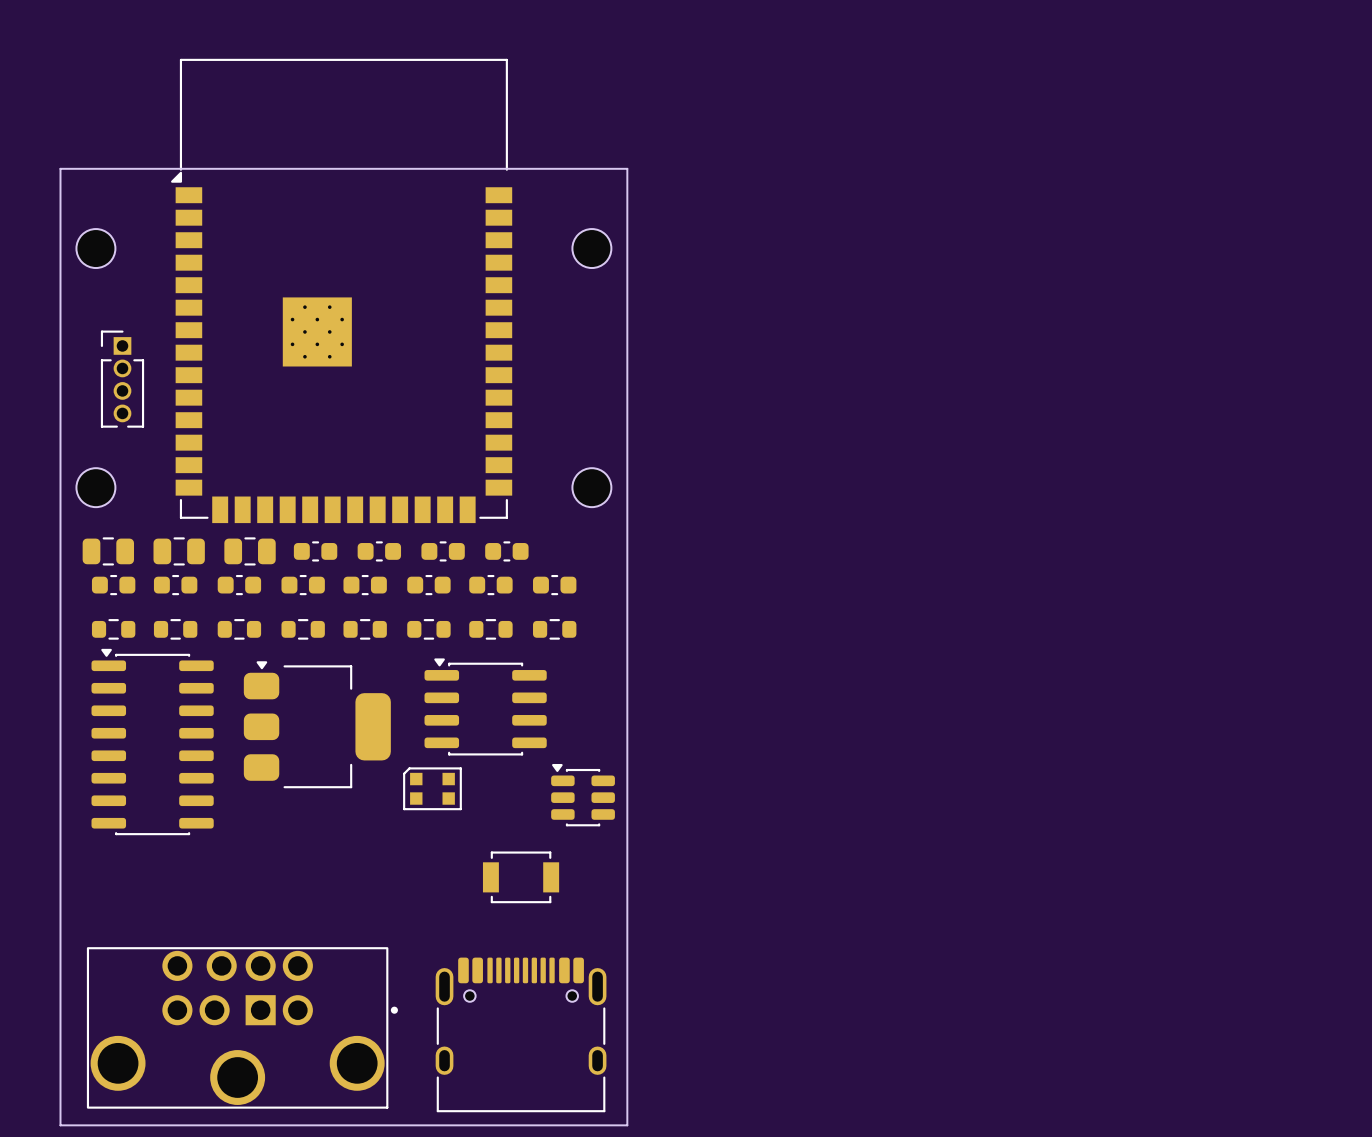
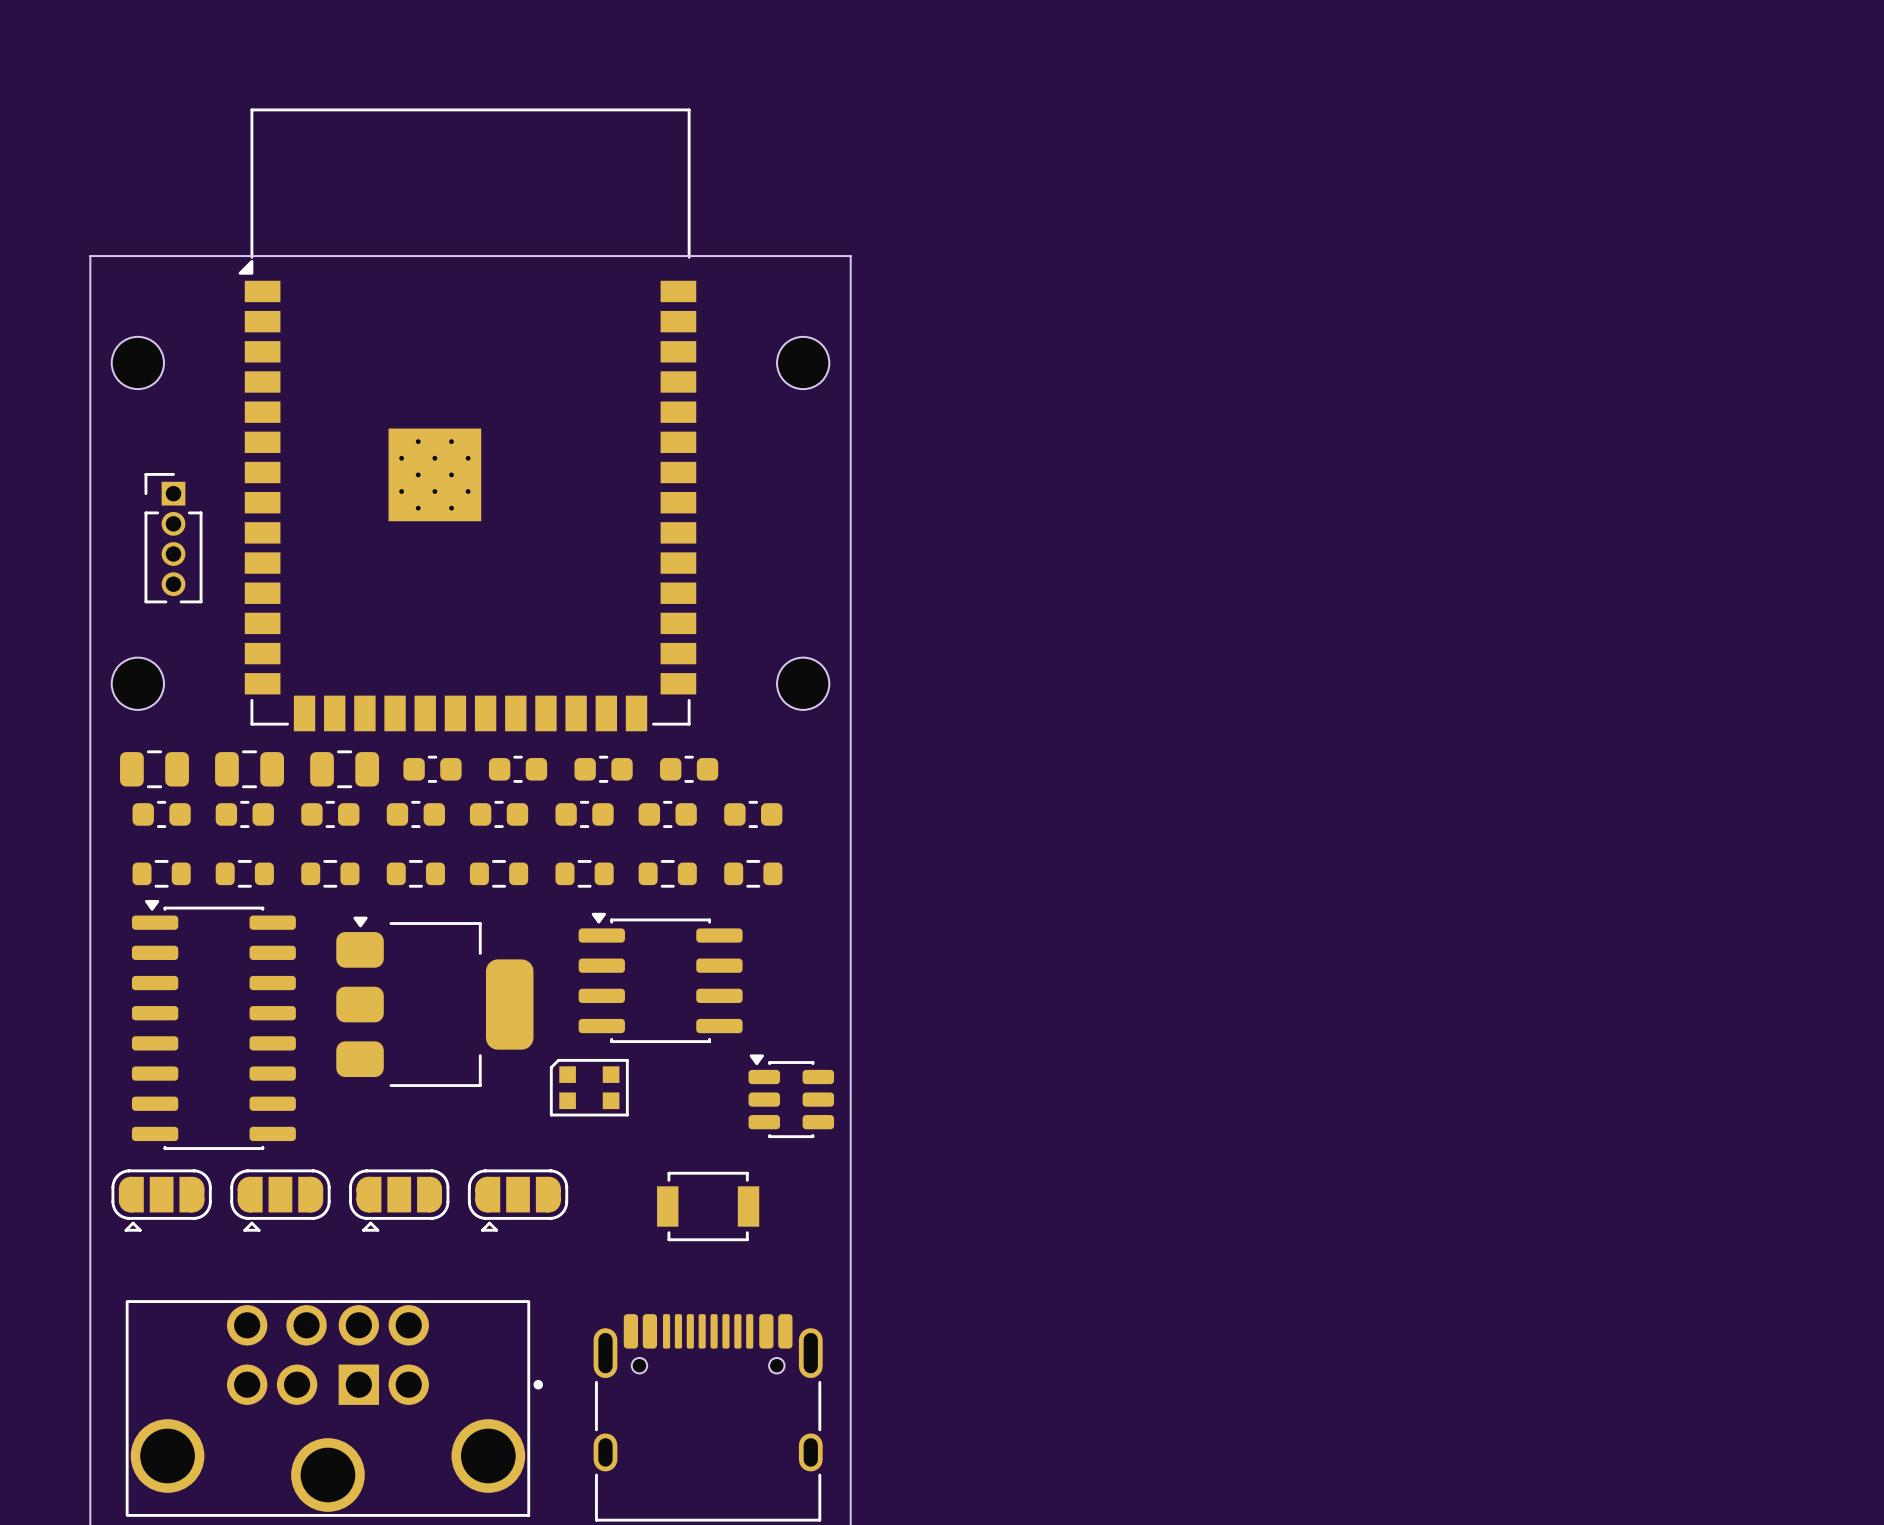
part: none -> (161, 1200)
part: none -> (280, 1200)
part: none -> (399, 1200)
part: none -> (518, 1200)

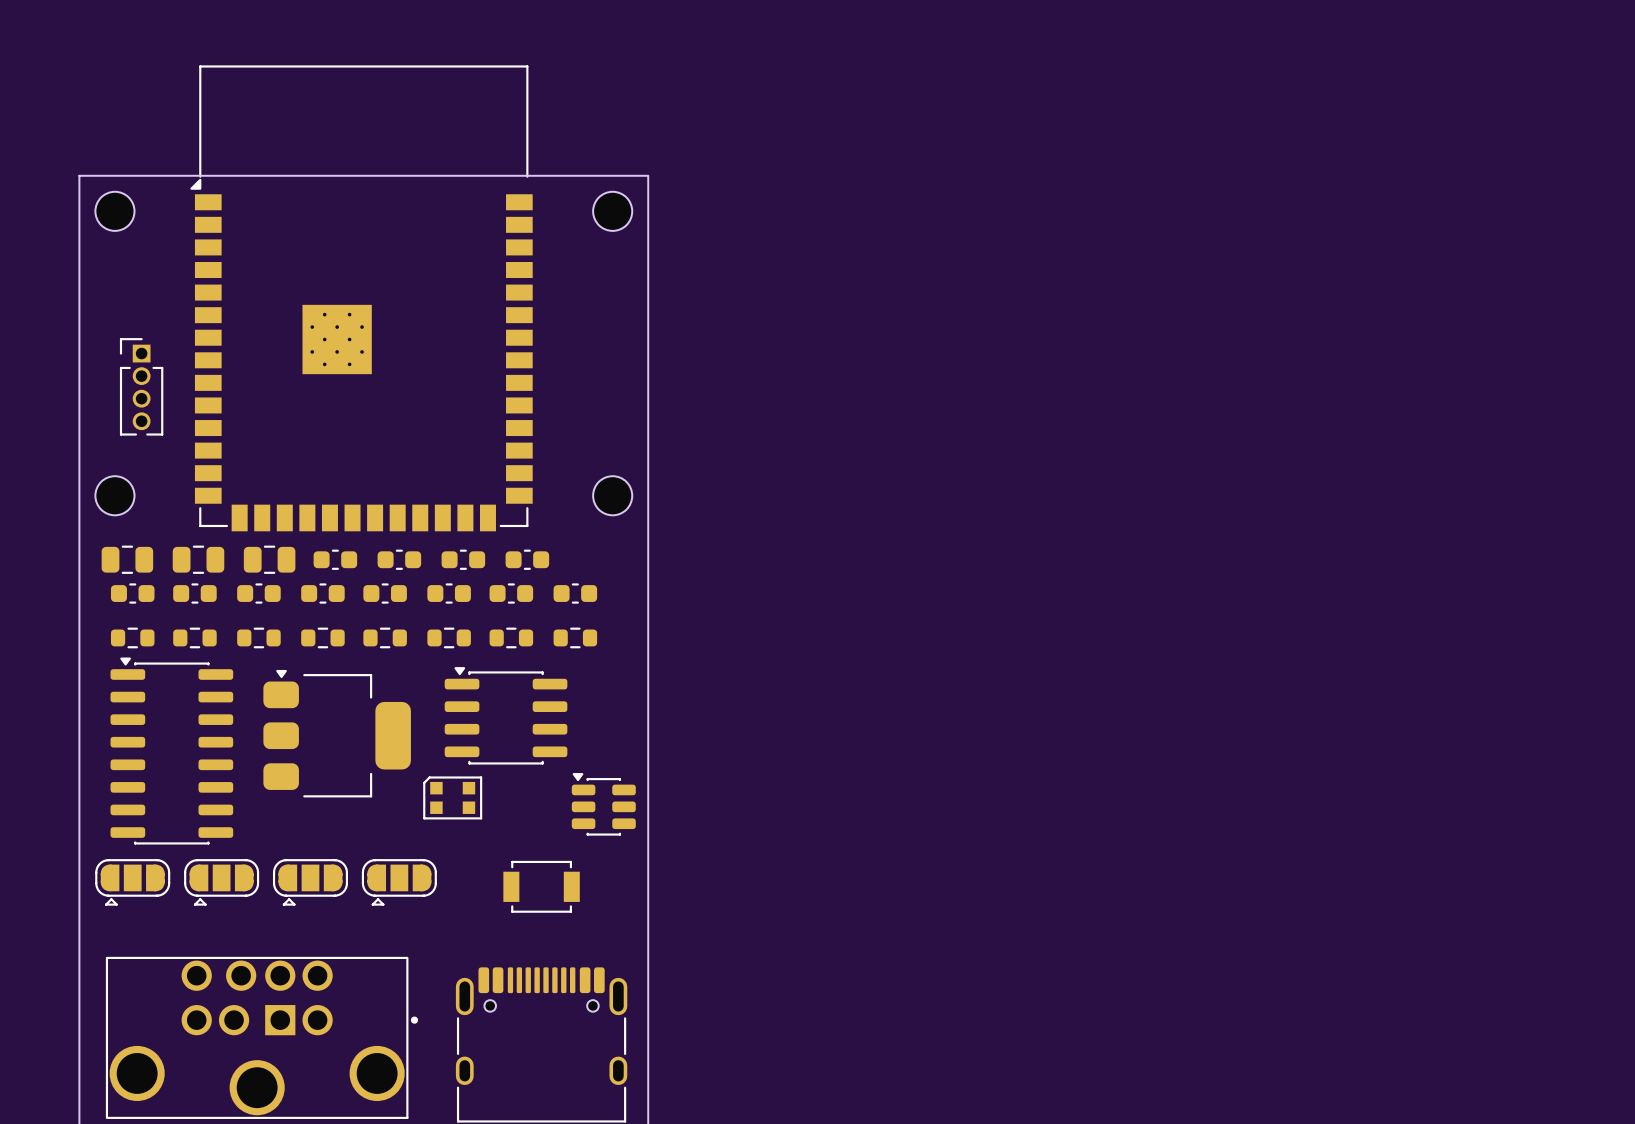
part position: (137, 362) -> (114, 211)
part position: (803, 362) -> (612, 211)

